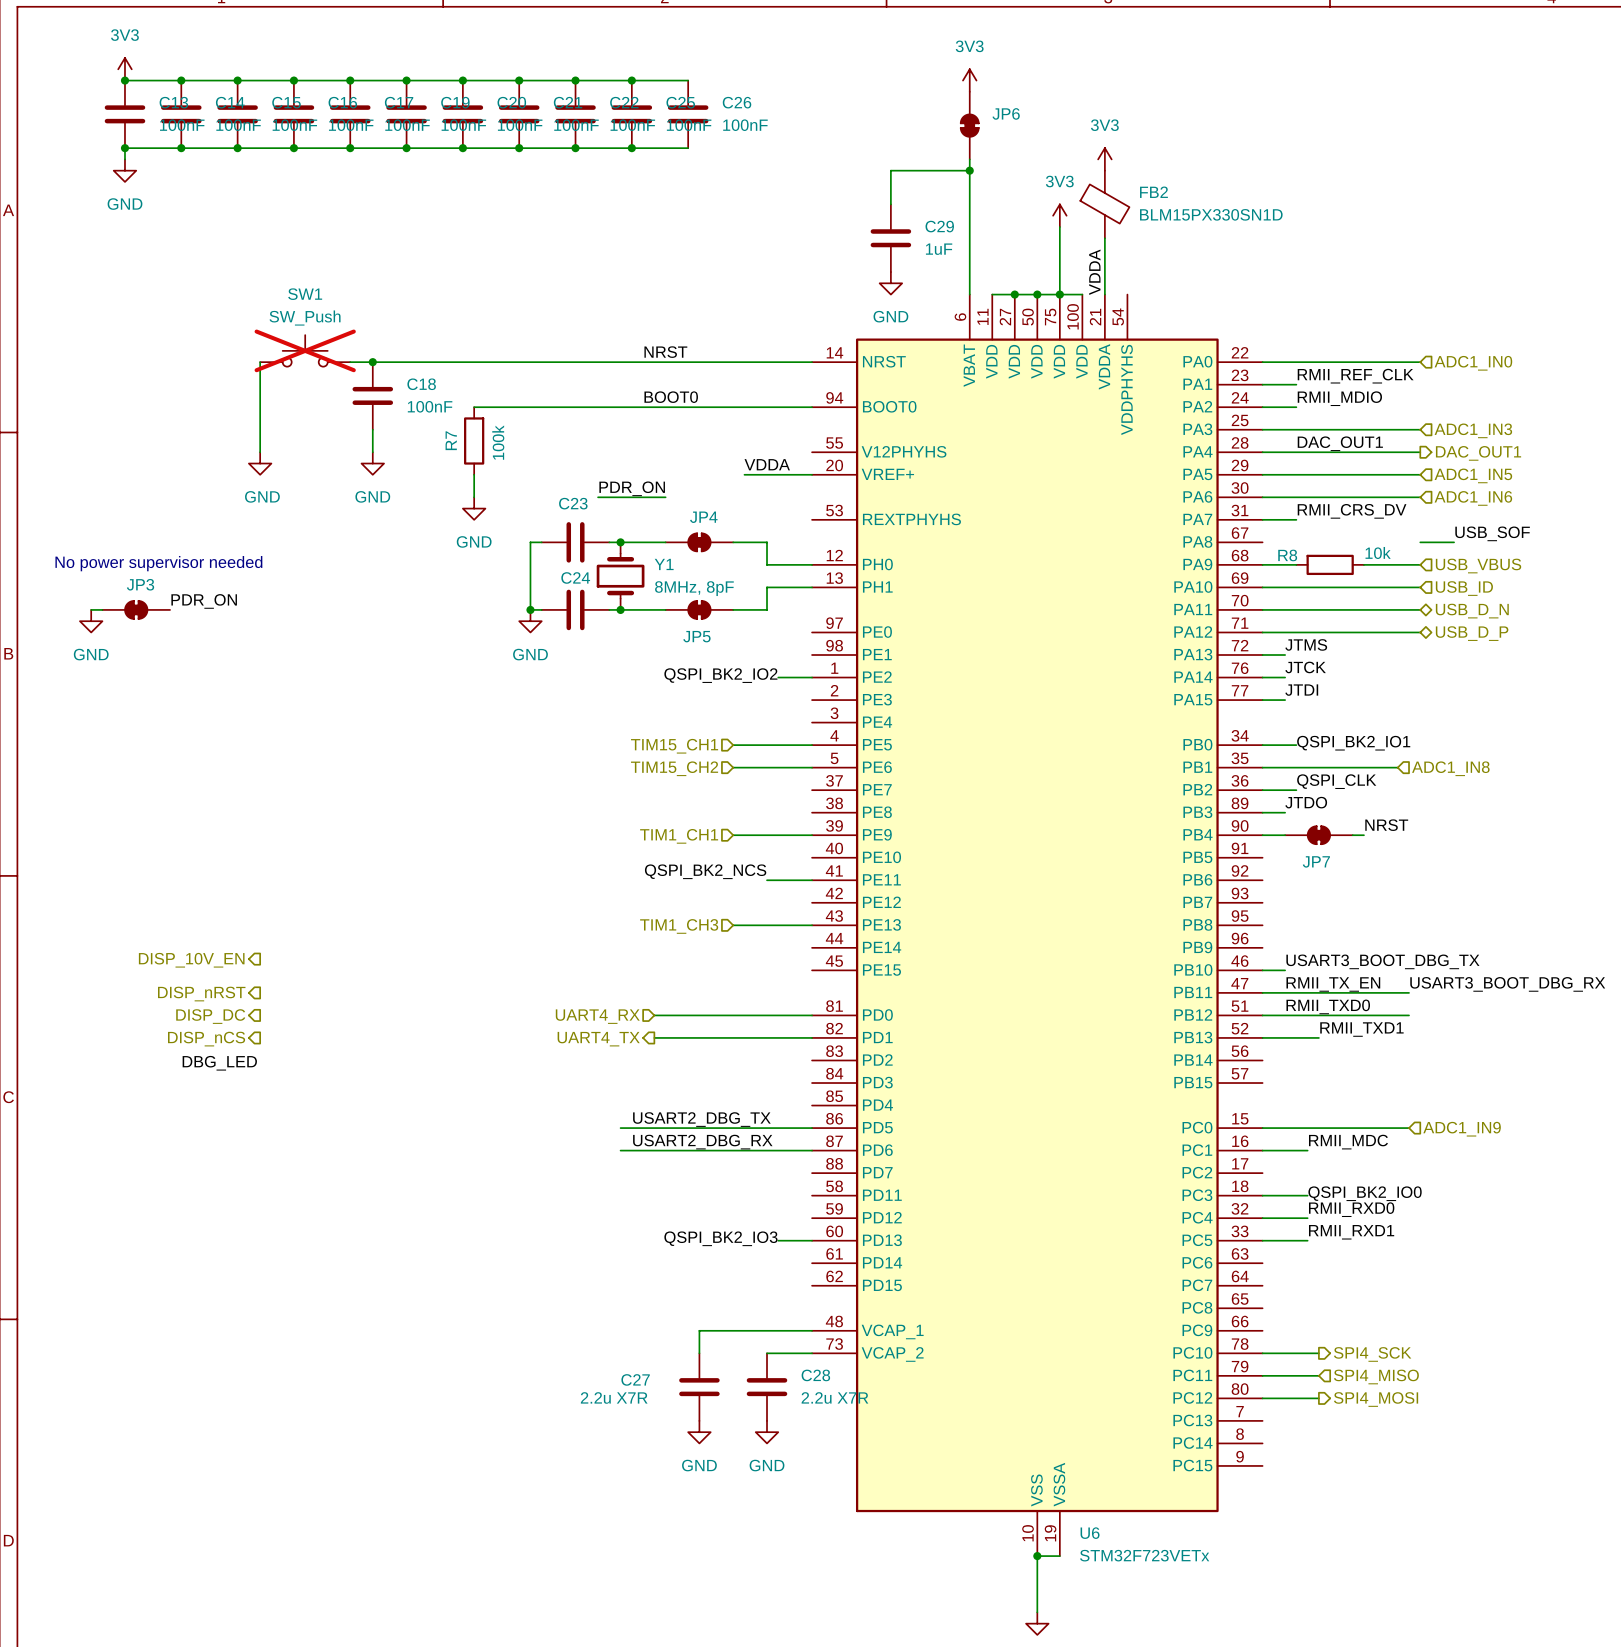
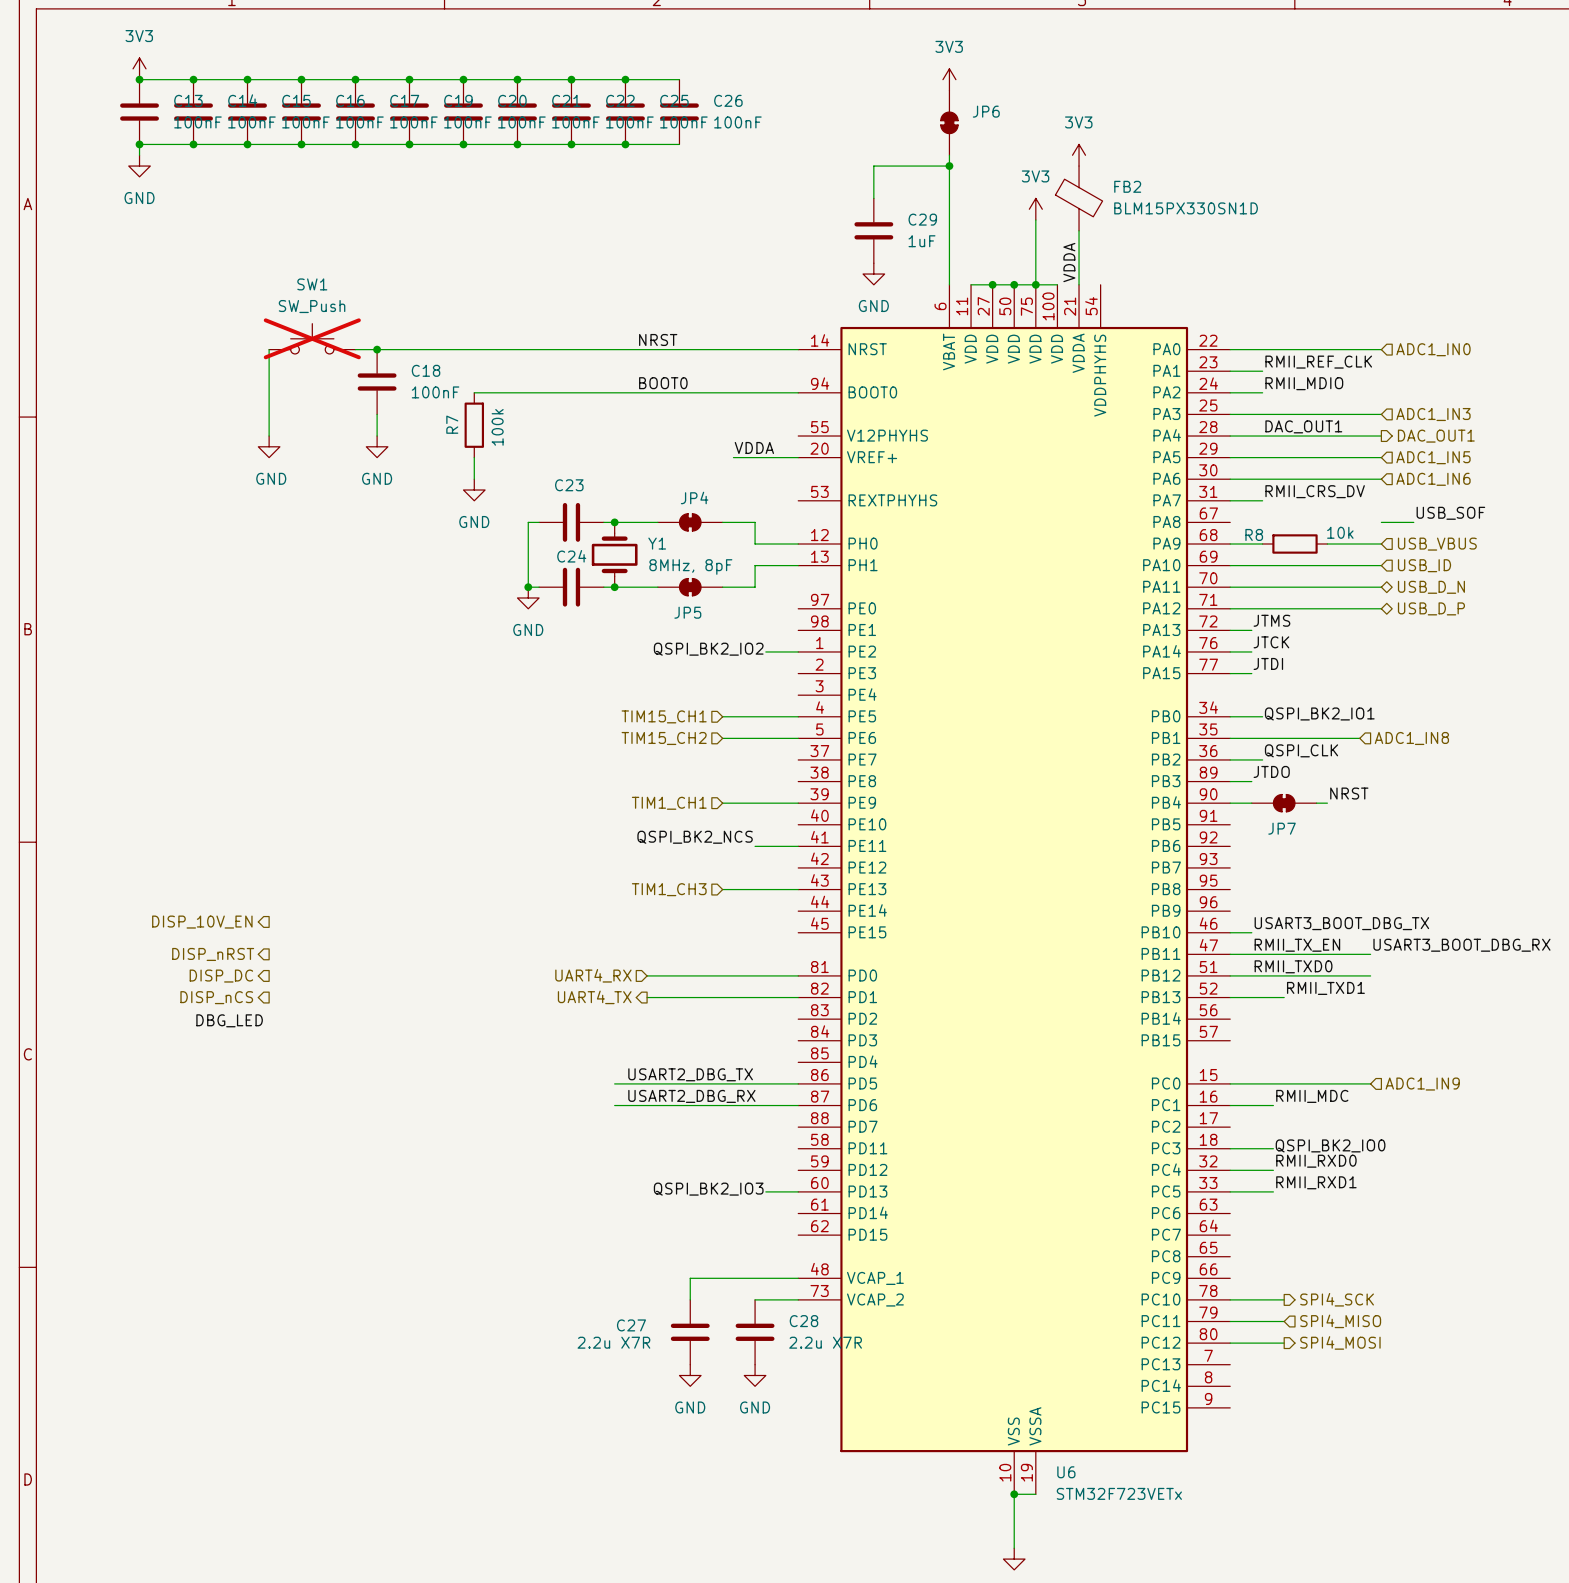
label: PDR_ON (632, 488) -> none
wire: (598, 497) (665, 497) -> none
text: No power supervisor needed (158, 563) -> none
label: PDR_ON (204, 601) -> none
wire: (91, 609) (102, 609) -> none
JP3: (136, 609) -> none
power symbol: GND (91, 621) -> none

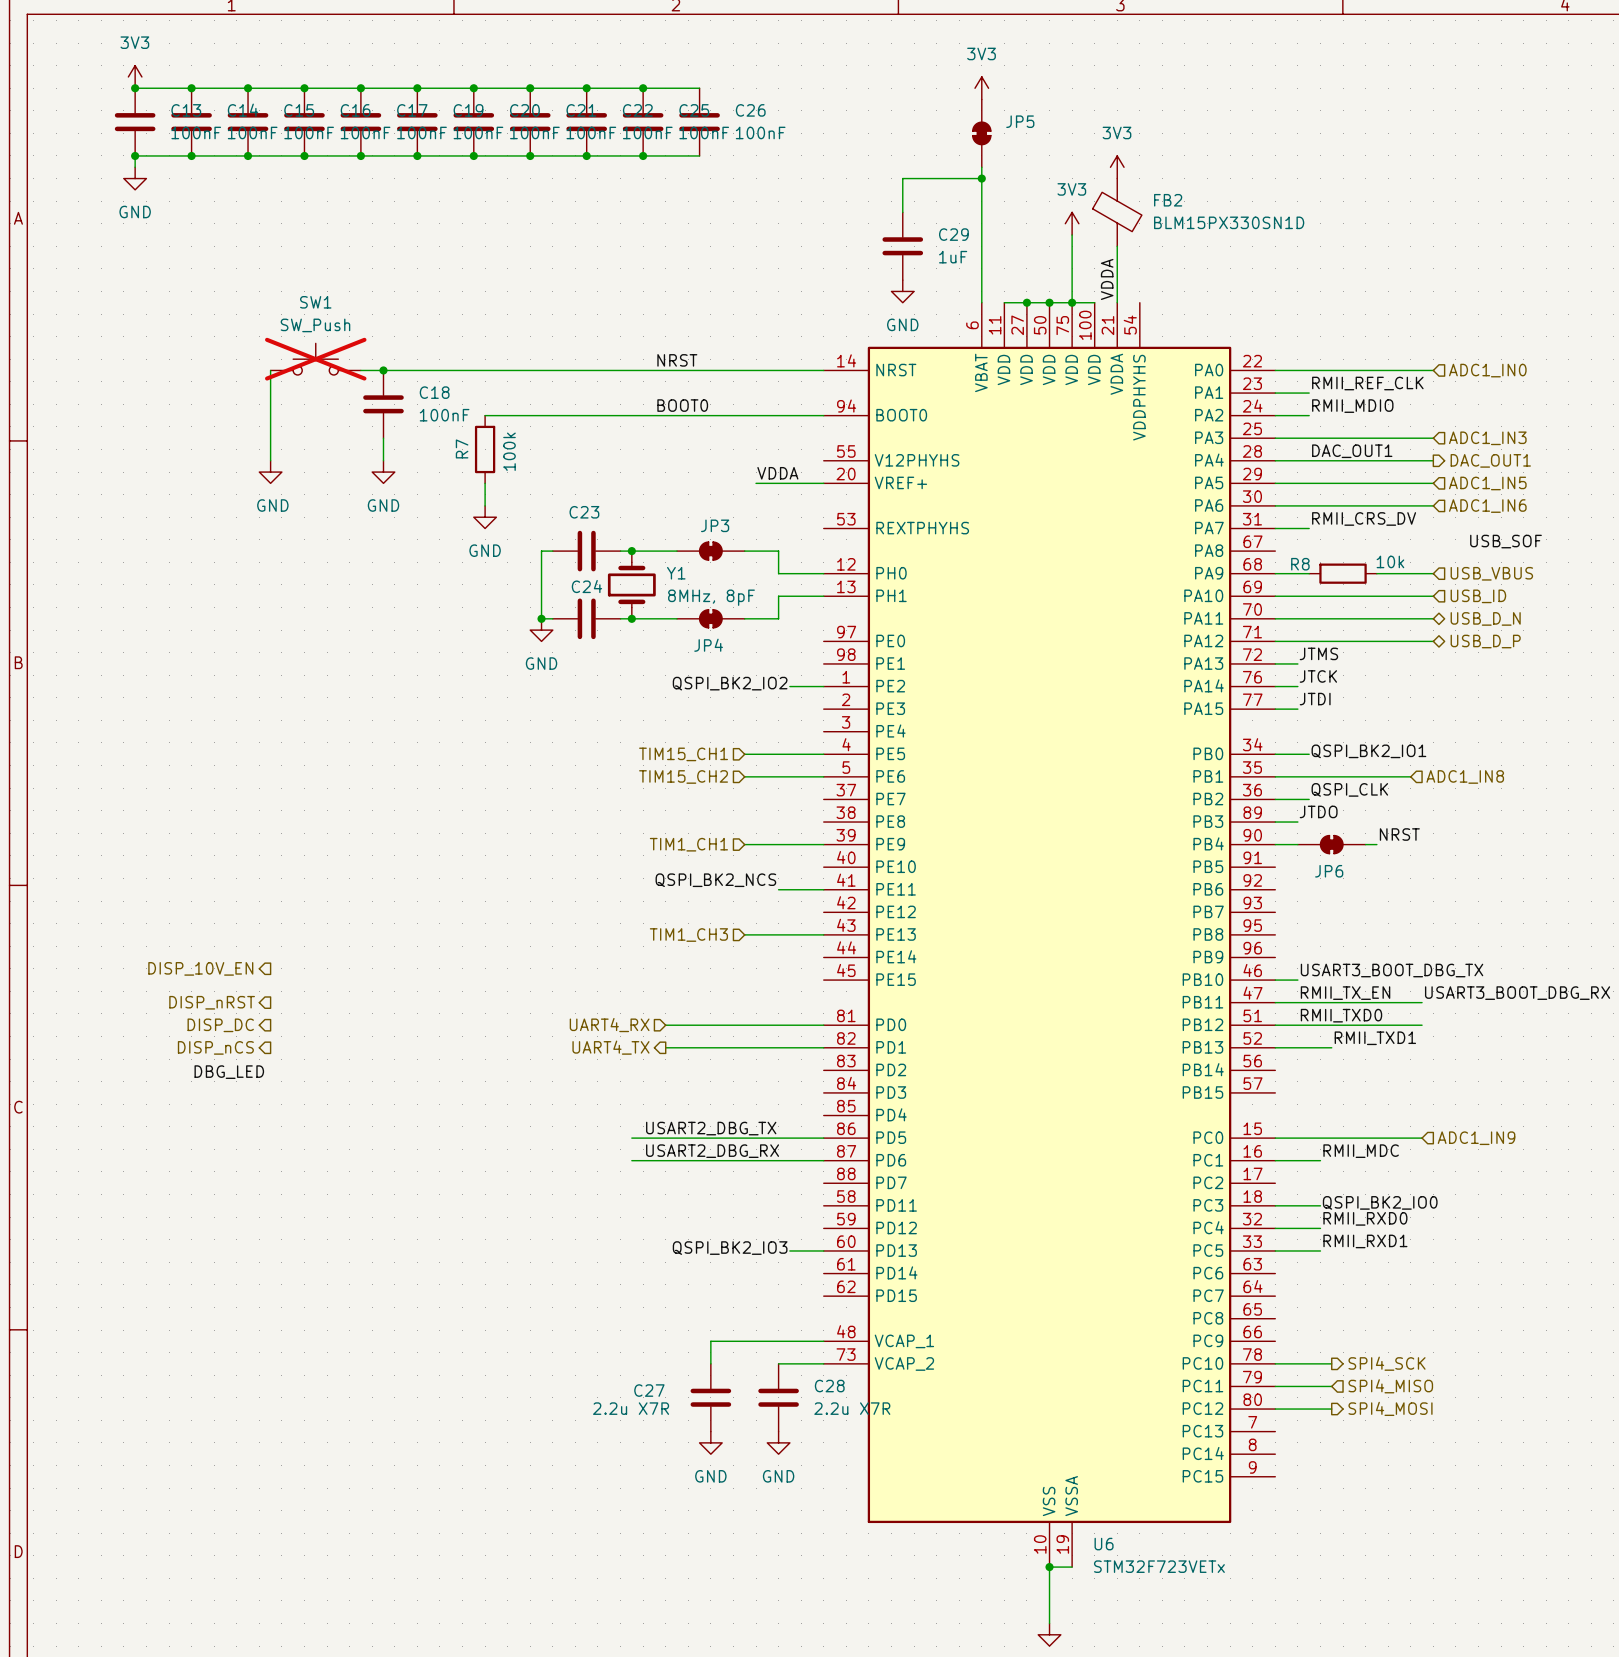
JP6 name: JP6 (986, 111) -> JP5 (1020, 121)
JP4 name: JP4 (694, 497) -> JP3 (715, 525)
wire: (1381, 522) (1413, 522) -> none
JP5 name: JP5 (687, 612) -> JP4 (708, 645)
JP7 name: JP7 (1282, 828) -> JP6 (1329, 871)

